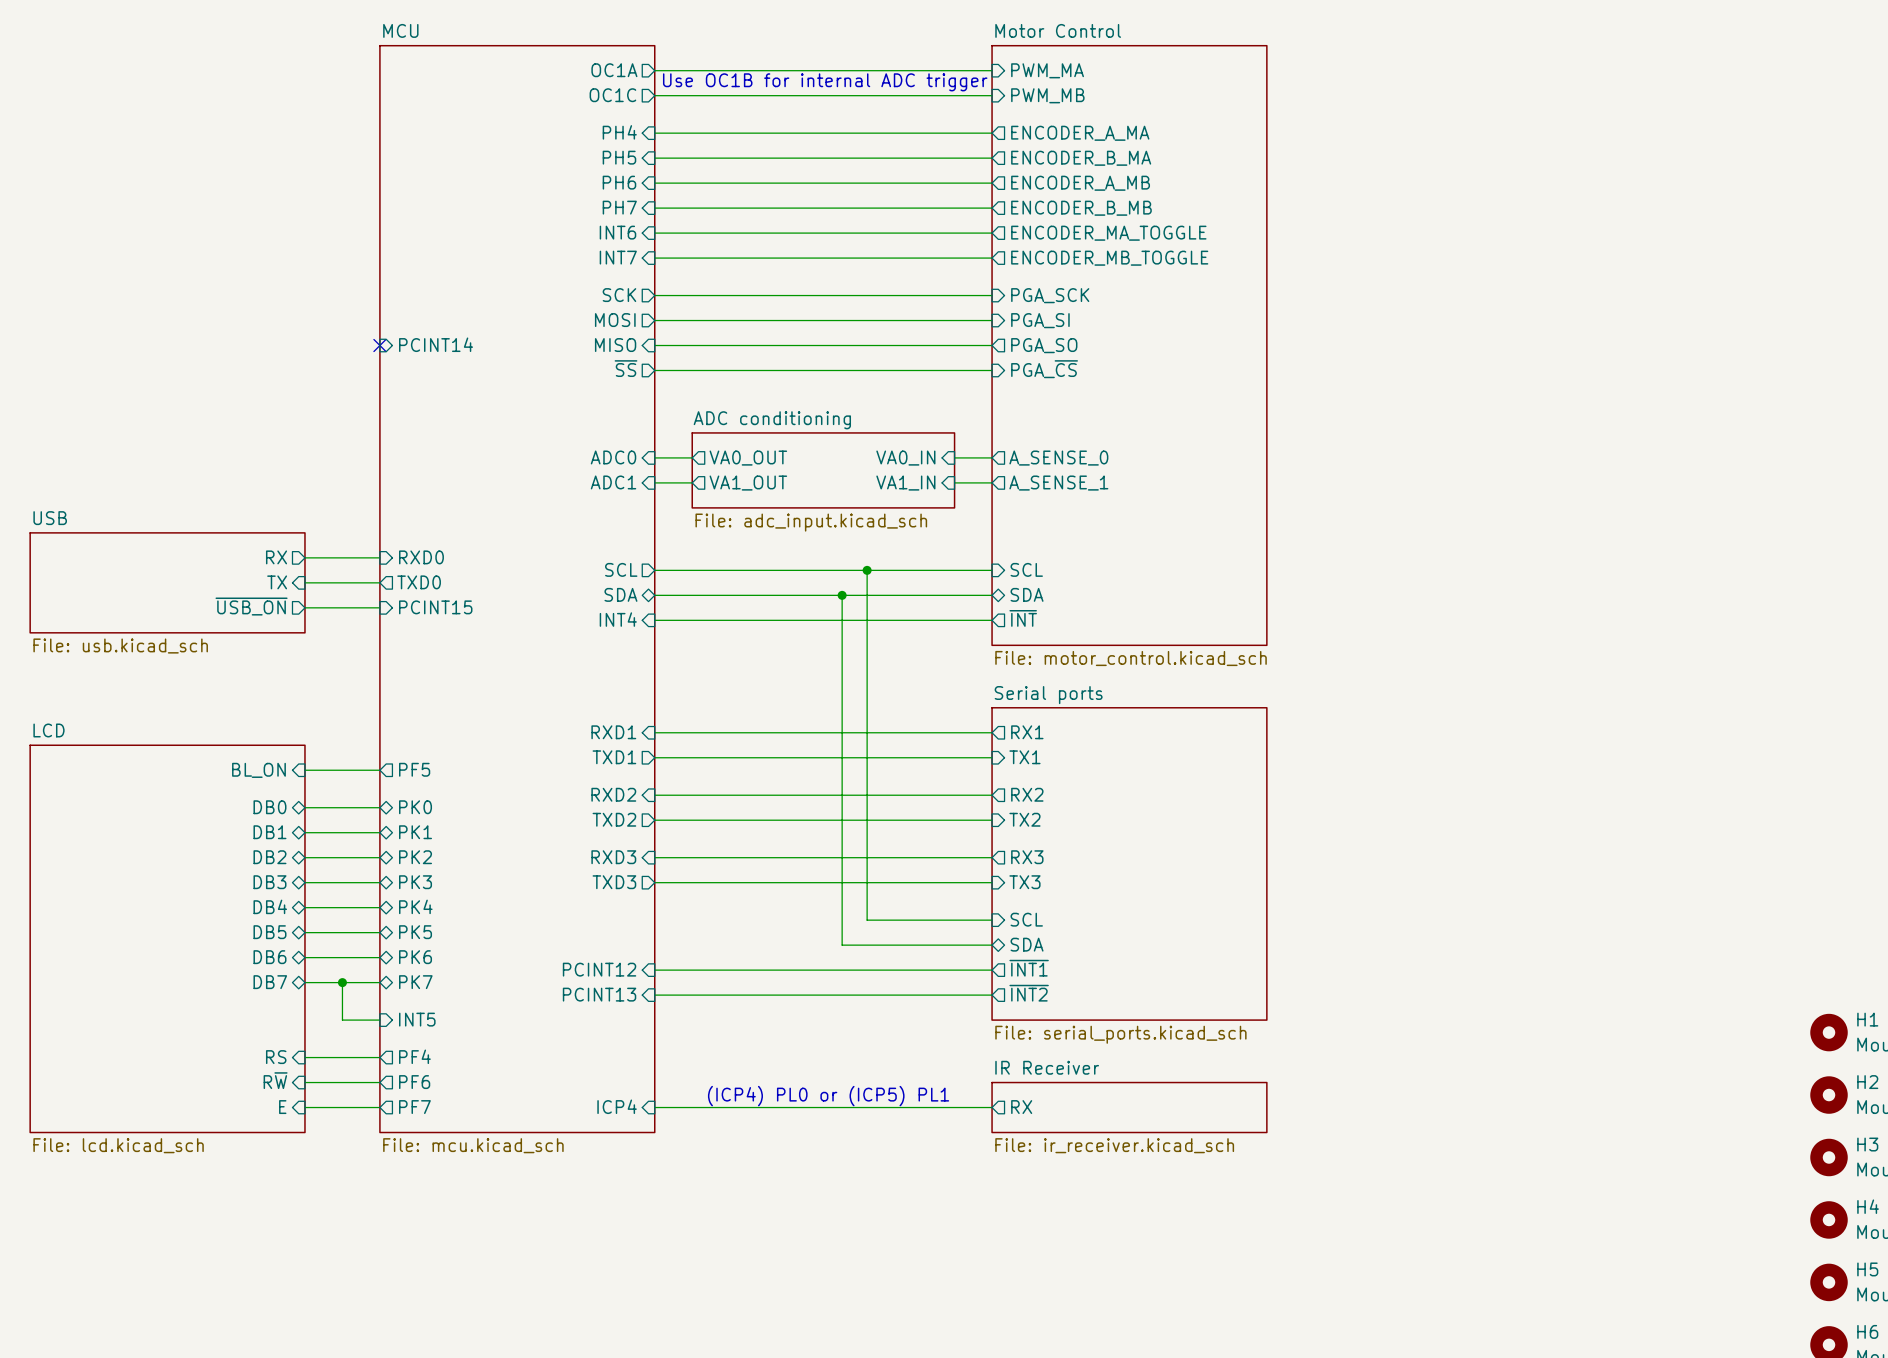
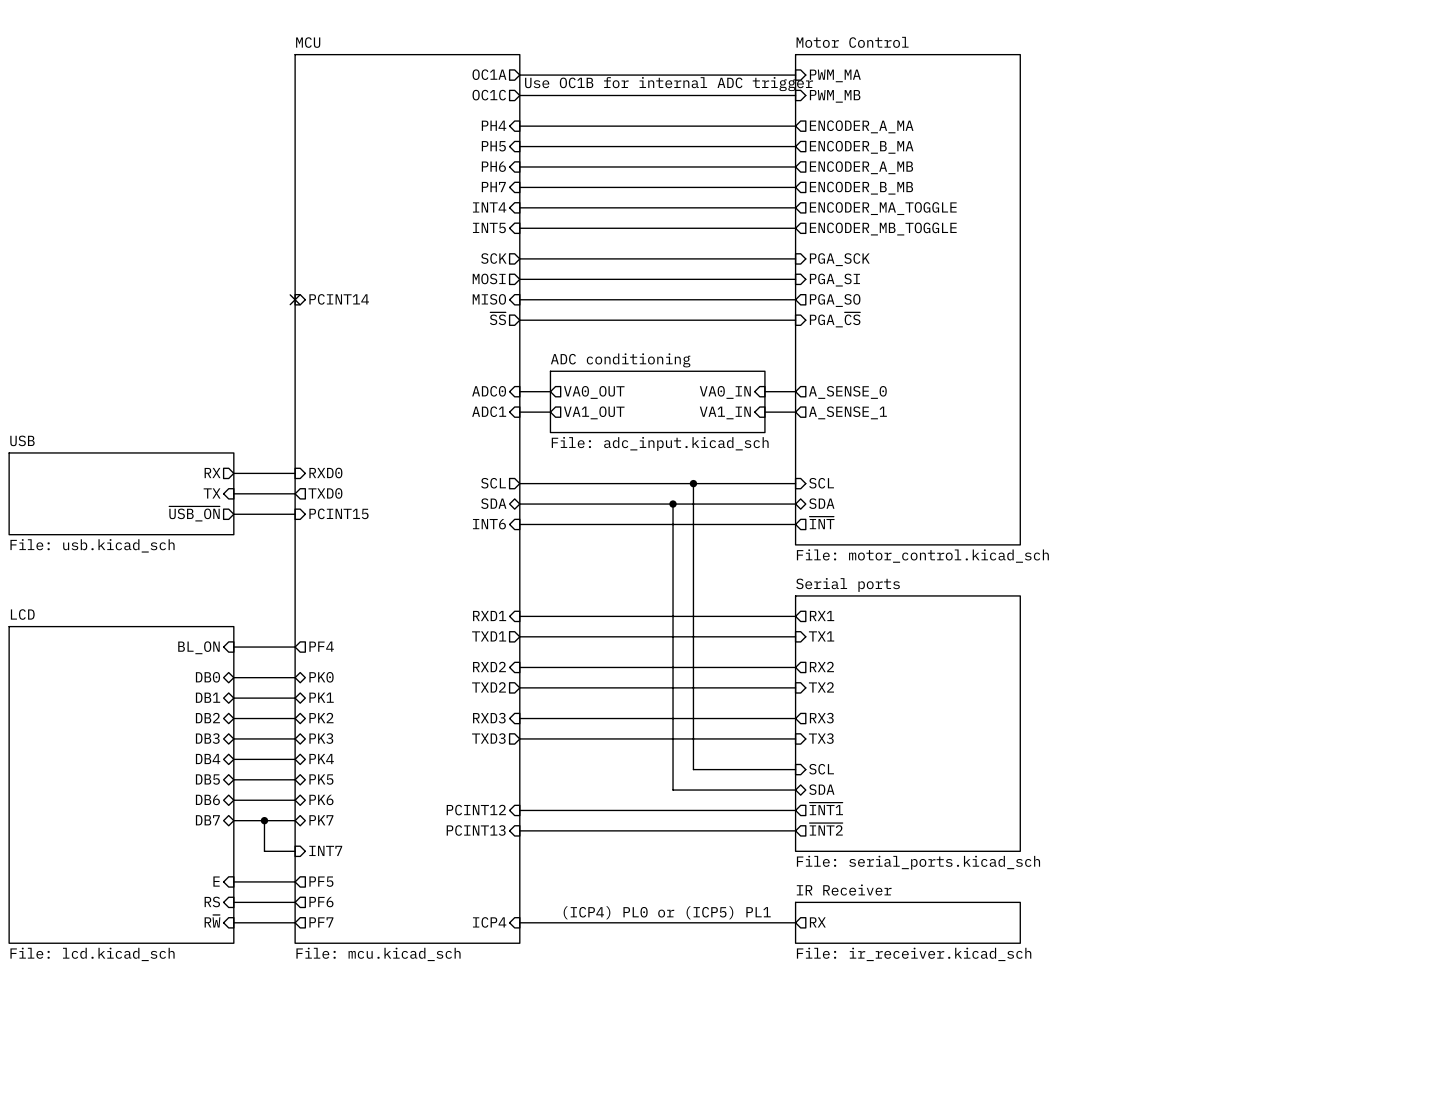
sheet pin: INT6 (617, 232) -> INT4 (489, 207)
sheet pin: INT7 (618, 257) -> INT5 (489, 227)
sheet pin: INT4 (618, 619) -> INT6 (489, 524)
sheet pin: PF5 (414, 769) -> PF4 (321, 646)
sheet pin: INT5 (417, 1019) -> INT7 (325, 850)
sheet pin: PF4 (414, 1056) -> PF5 (321, 881)
sheet pin: RS (276, 1057) -> E (216, 881)
sheet pin: R~{W} (275, 1080) -> RS (212, 901)
sheet pin: E (282, 1107) -> R~{W} (212, 921)

